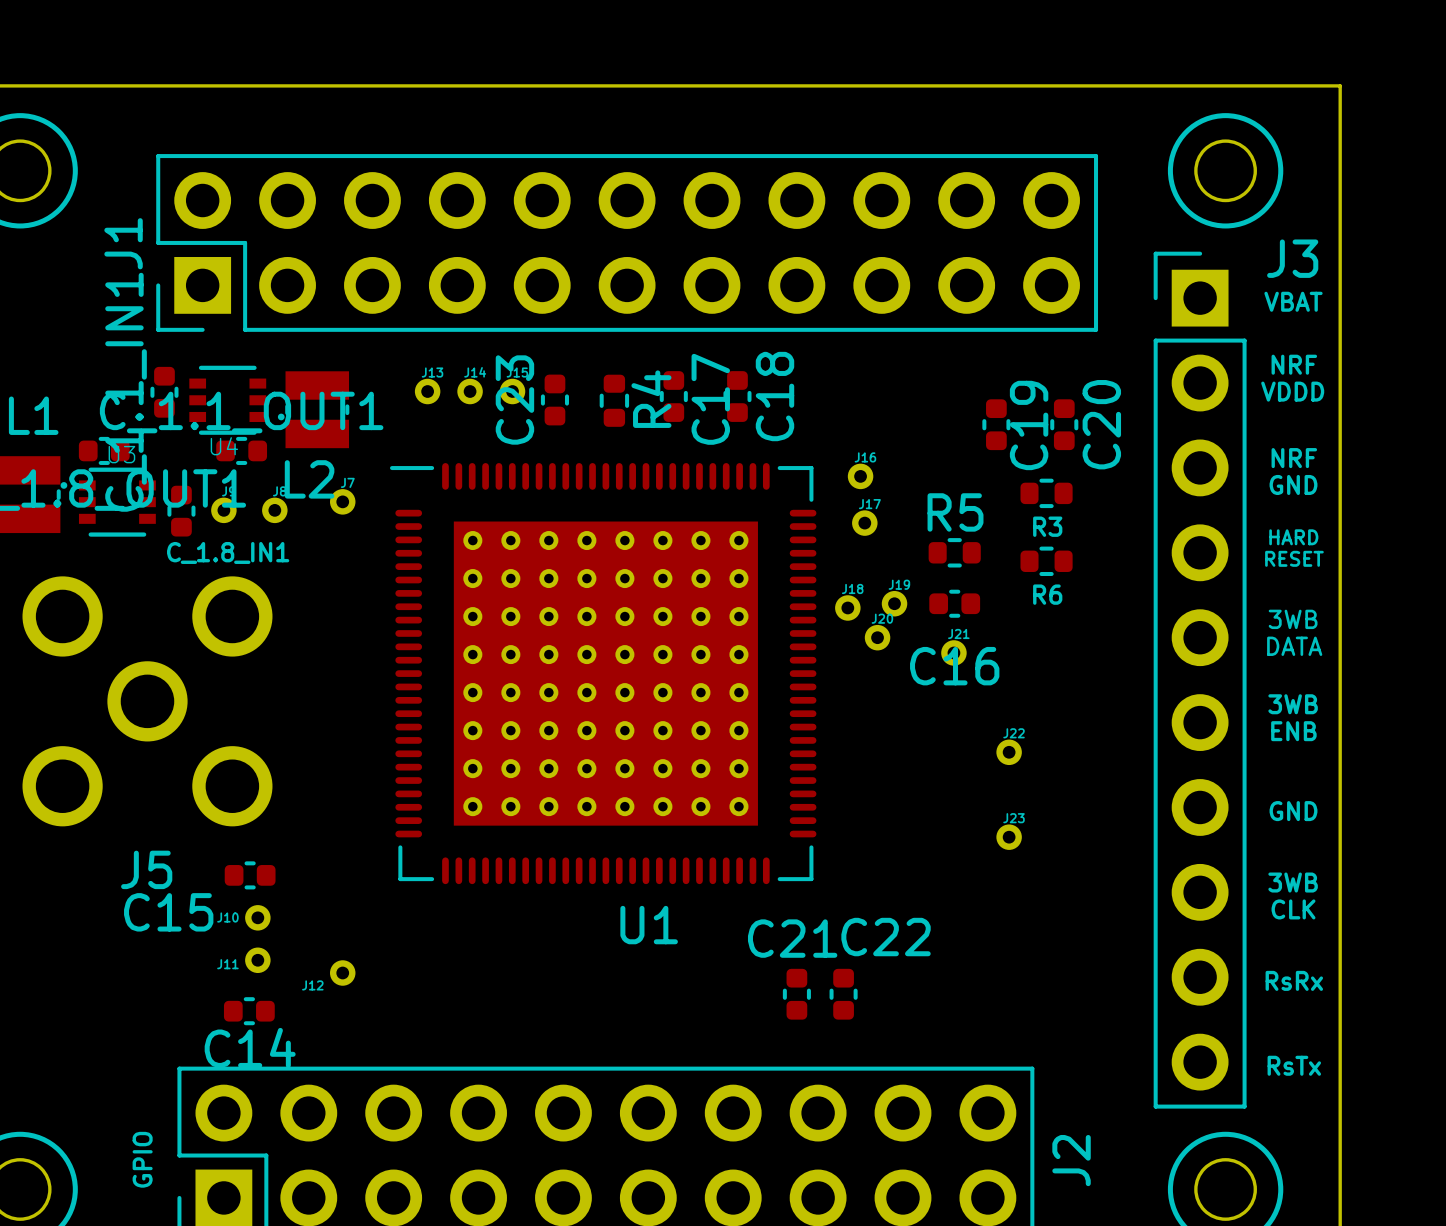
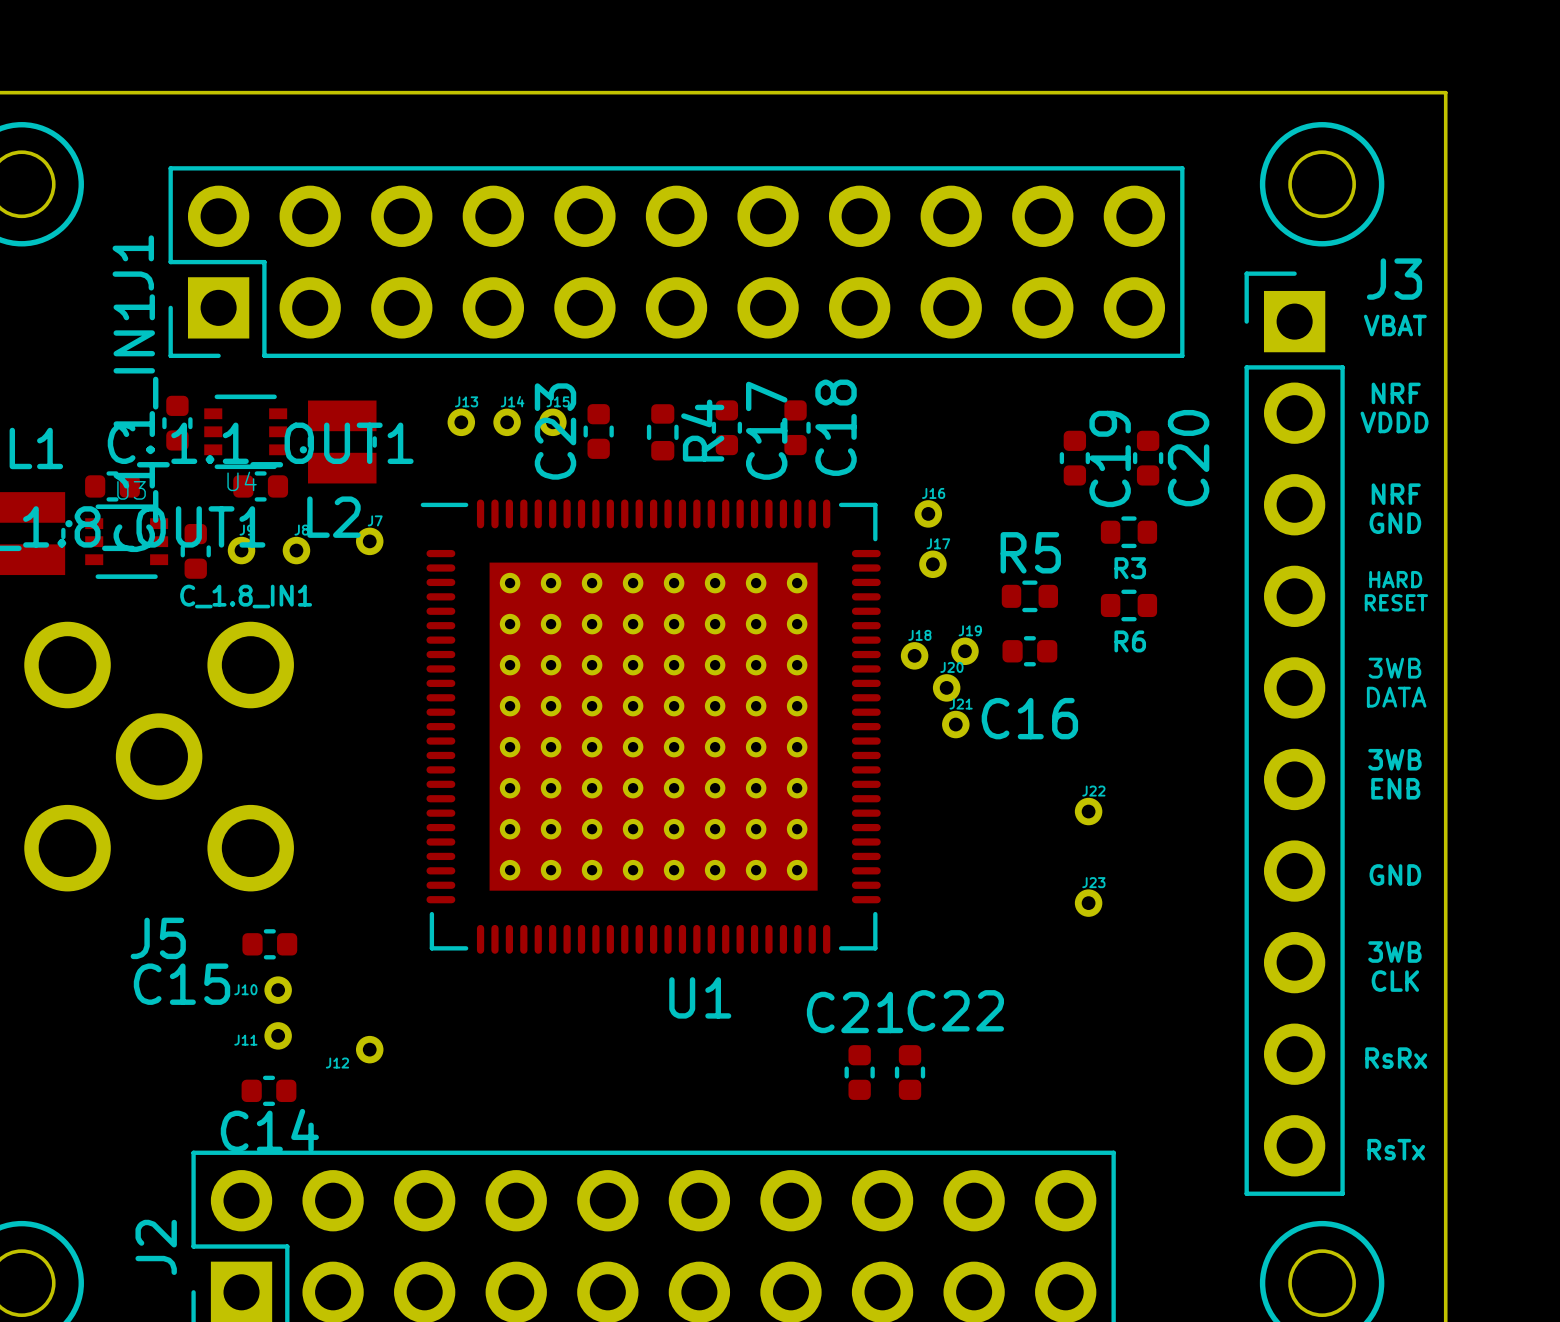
J21 position: (953, 652) -> (955, 724)
text: GPIO (142, 1159) -> none
J2 name position: J2 (1071, 1160) -> J2 (156, 1247)

